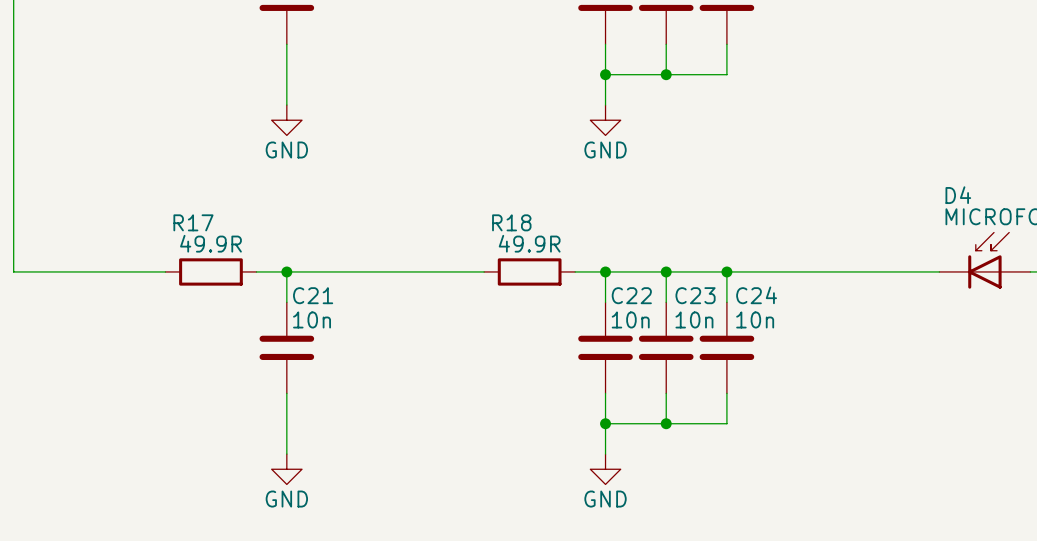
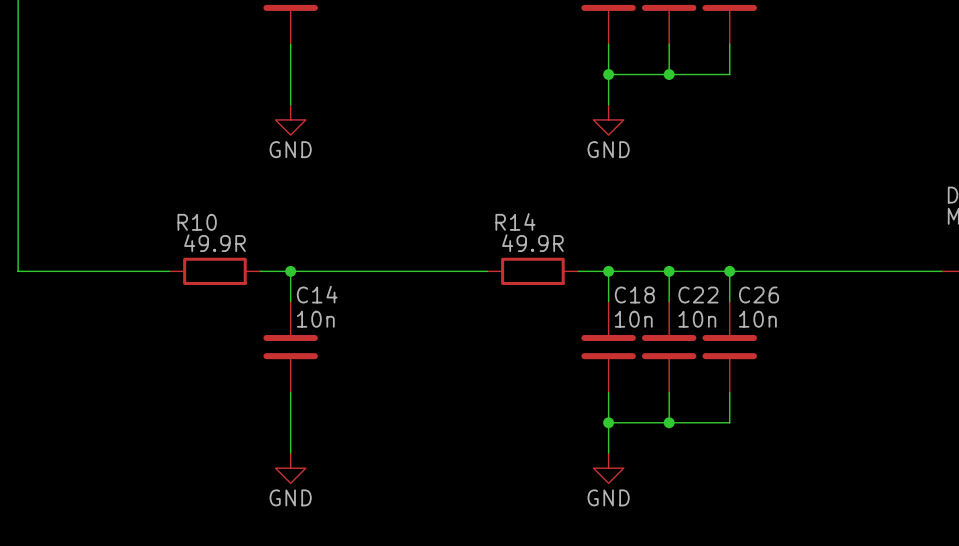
R17 name: R17 (193, 222) -> R10 (197, 222)
R18 name: R18 (511, 222) -> R14 (515, 221)
C21 name: C21 (313, 295) -> C14 (317, 294)
C22 name: C22 (631, 295) -> C18 (634, 295)
C23 name: C23 (695, 295) -> C22 (698, 295)
C24 name: C24 (756, 295) -> C26 (758, 295)

